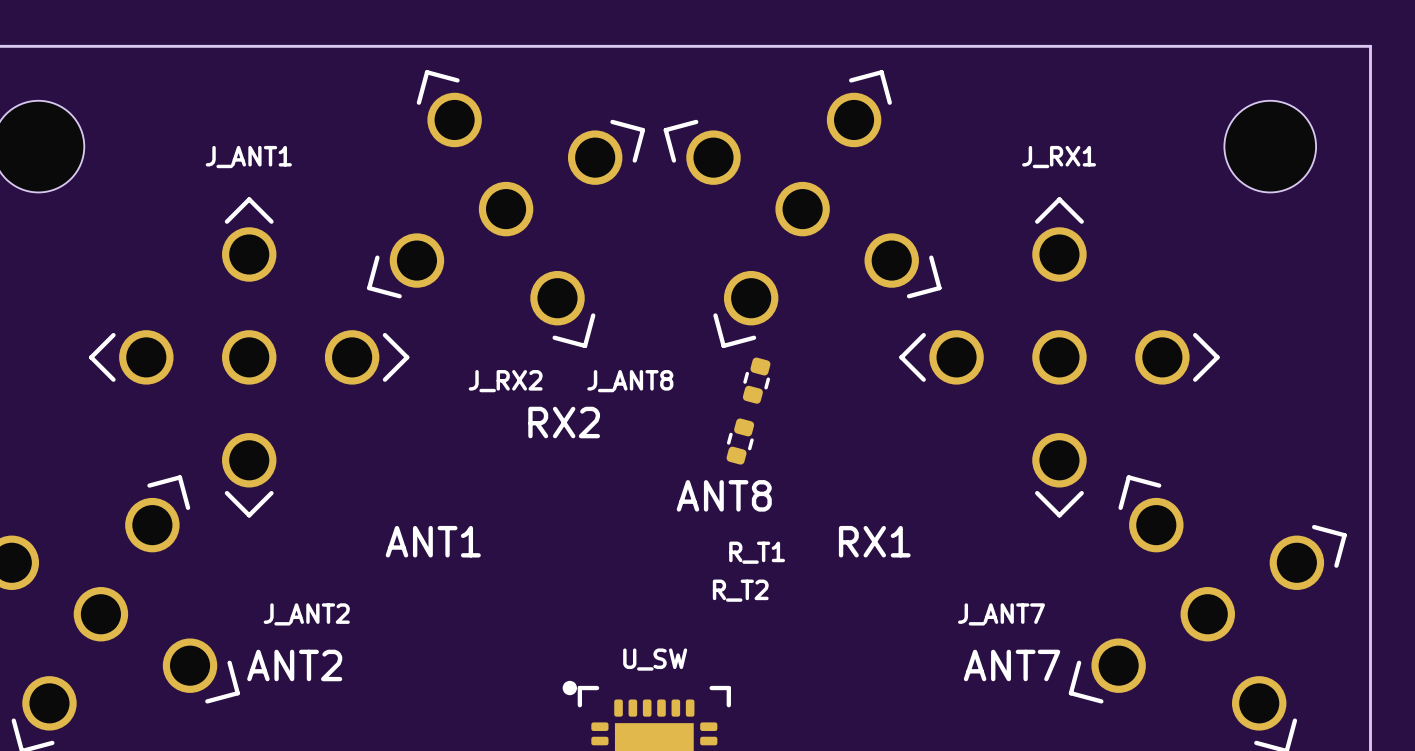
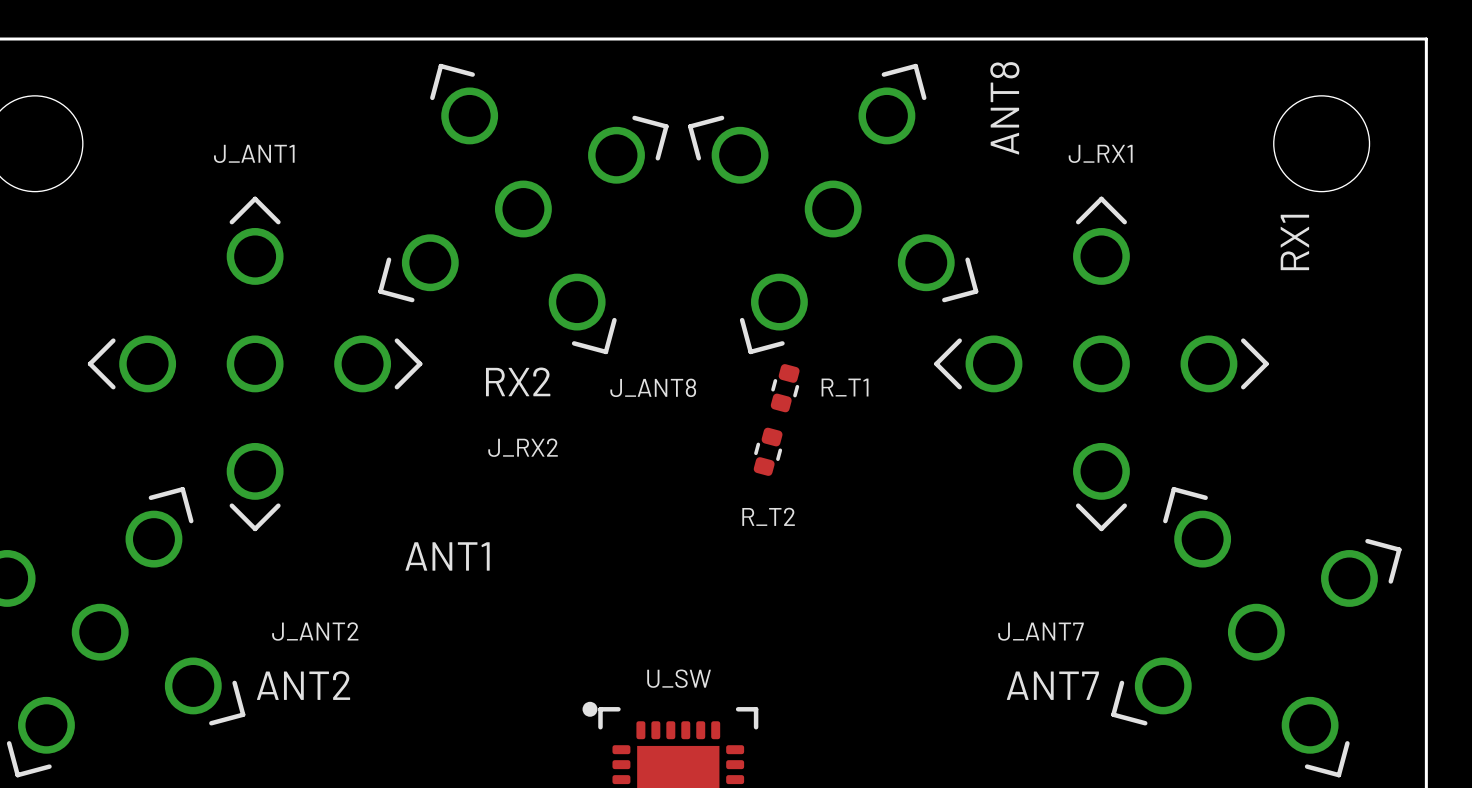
J_RX2 name position: J_RX2 (505, 381) -> J_RX2 (523, 447)
text position: RX2 (564, 422) -> RX2 (518, 381)
text rotation: 0° (724, 495) -> 90° counterclockwise (1004, 108)
text position: ANT8 (724, 495) -> ANT8 (1004, 108)
text rotation: 0° (874, 541) -> 90° counterclockwise (1294, 242)
text position: RX1 (874, 541) -> RX1 (1294, 242)
R_T1 name position: R_T1 (757, 552) -> R_T1 (845, 387)
R_T2 name position: R_T2 (740, 590) -> R_T2 (768, 516)

